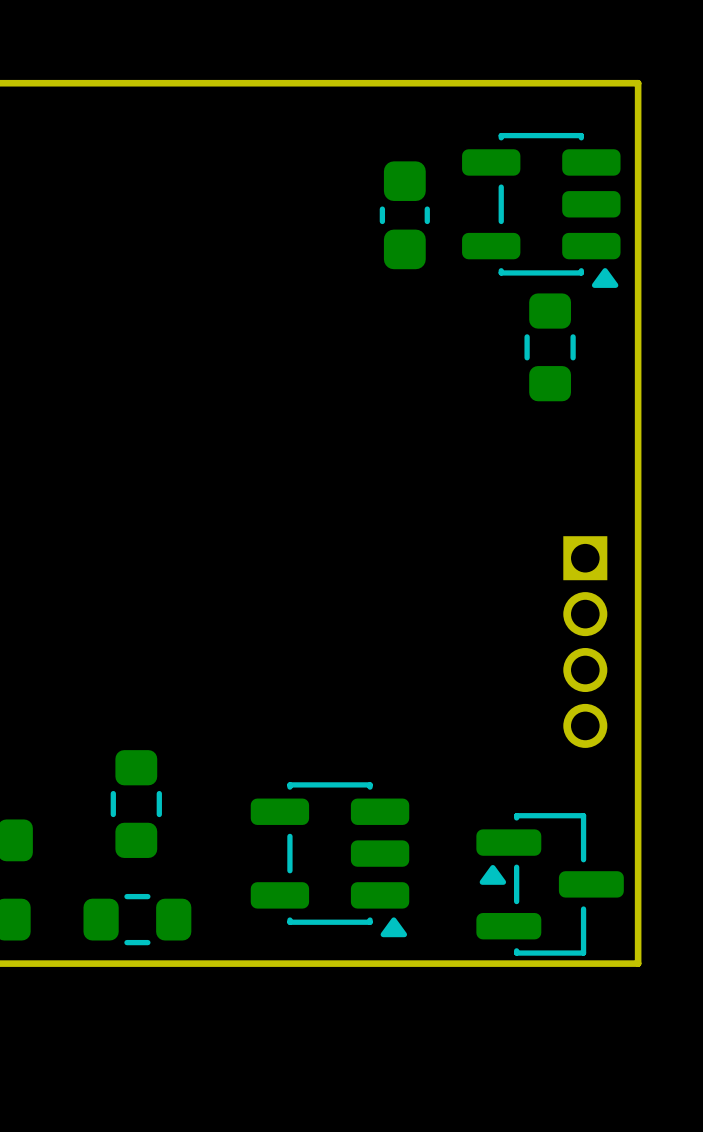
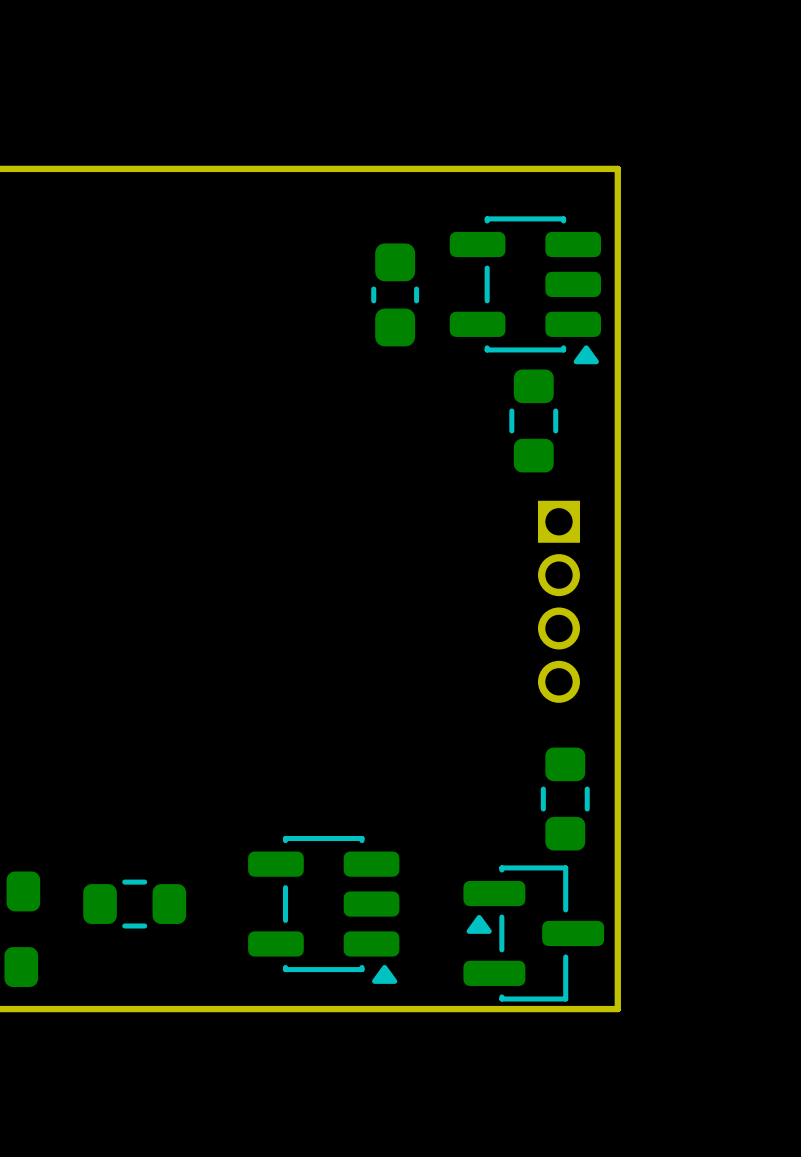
part position: (585, 642) -> (558, 601)
part: none -> (565, 799)
part: (136, 804) -> none
part: none -> (134, 904)
part: (137, 919) -> none

